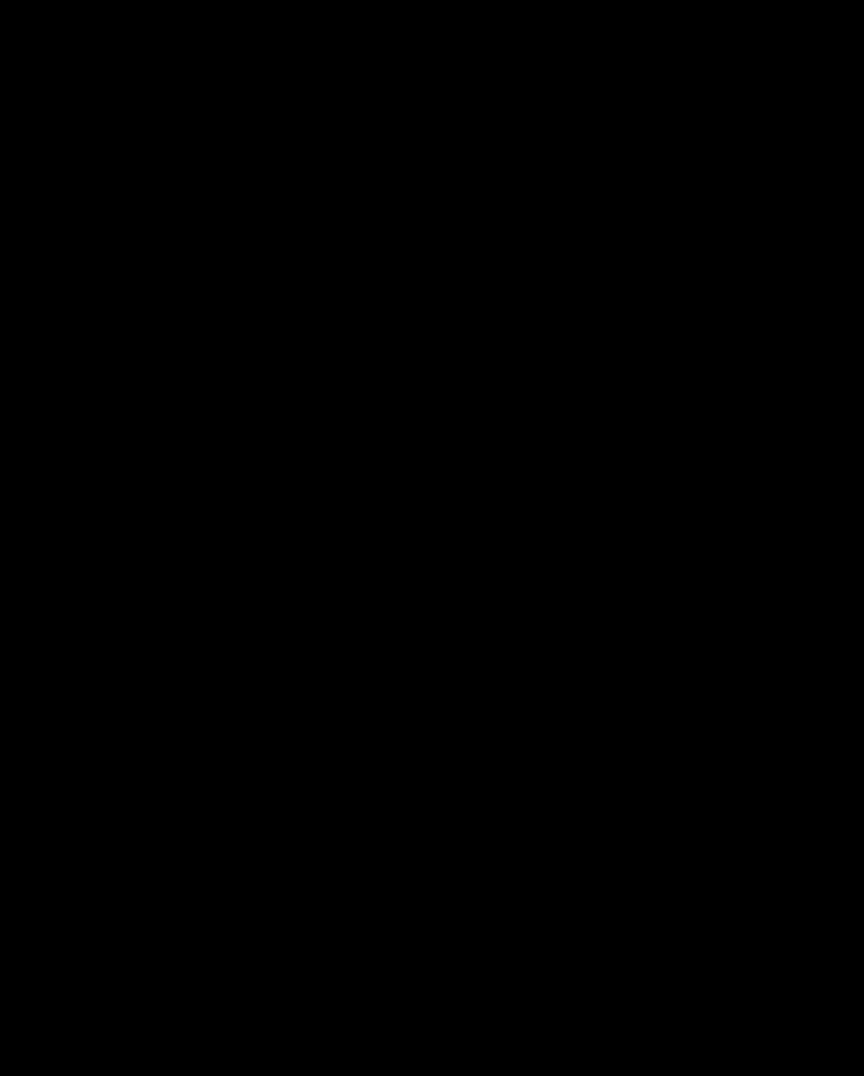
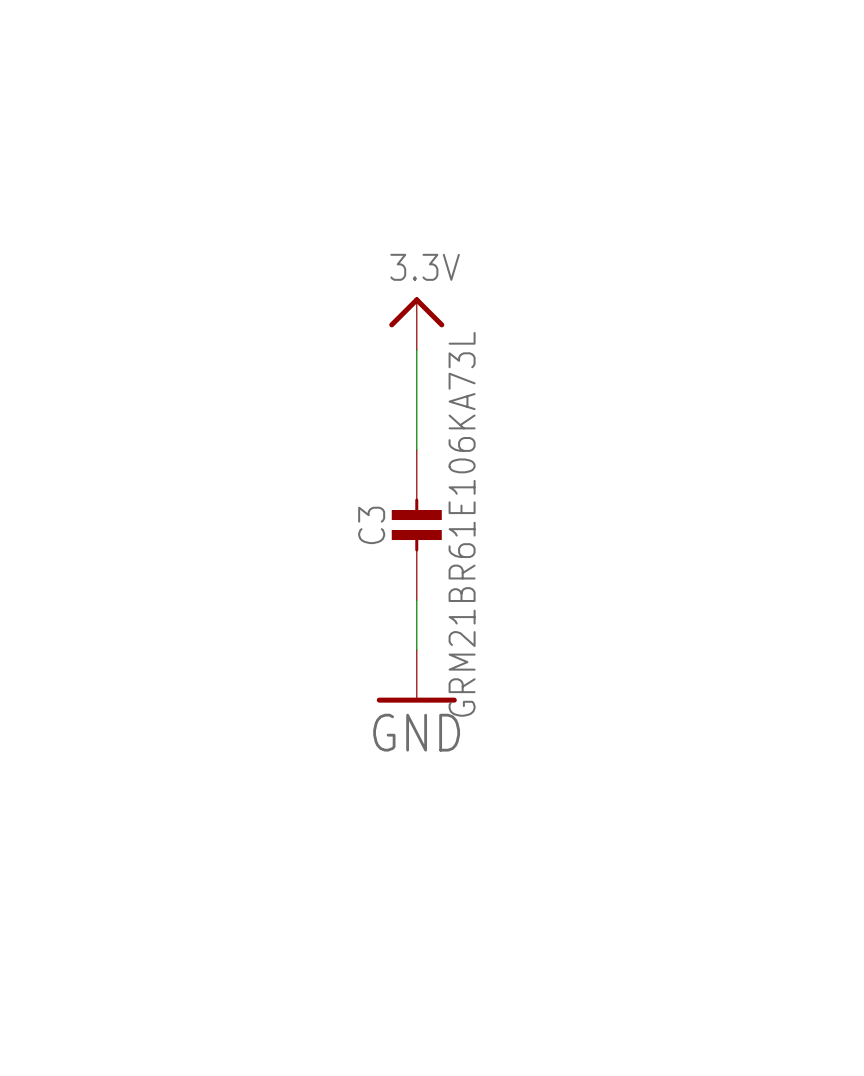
power symbol: none -> 3.3V (416, 323)
wire: none -> (416, 349) (416, 449)
C3: none -> GRM21BR61E106KA73L (416, 525)
wire: none -> (416, 600) (416, 650)
power symbol: none -> GND (416, 676)

